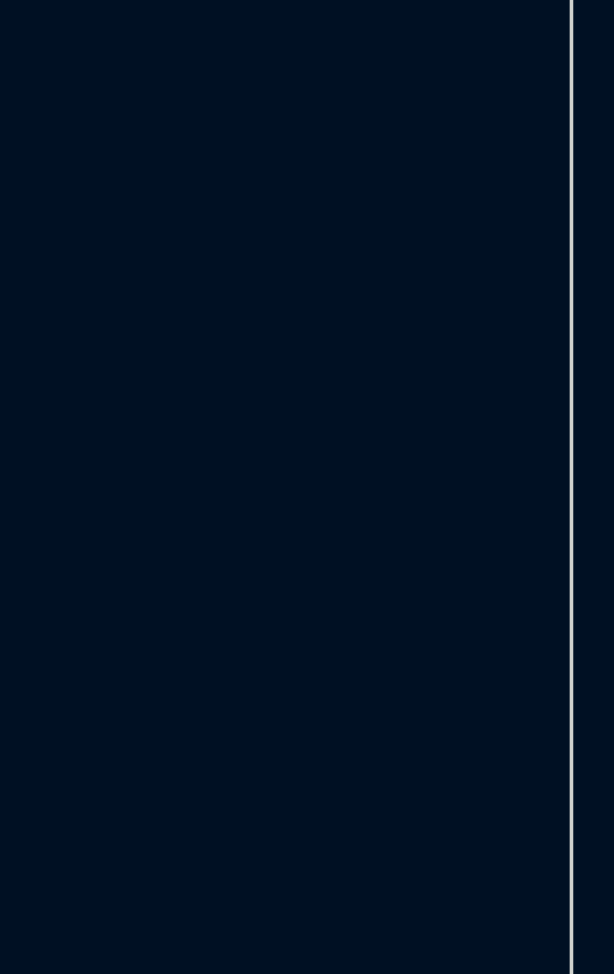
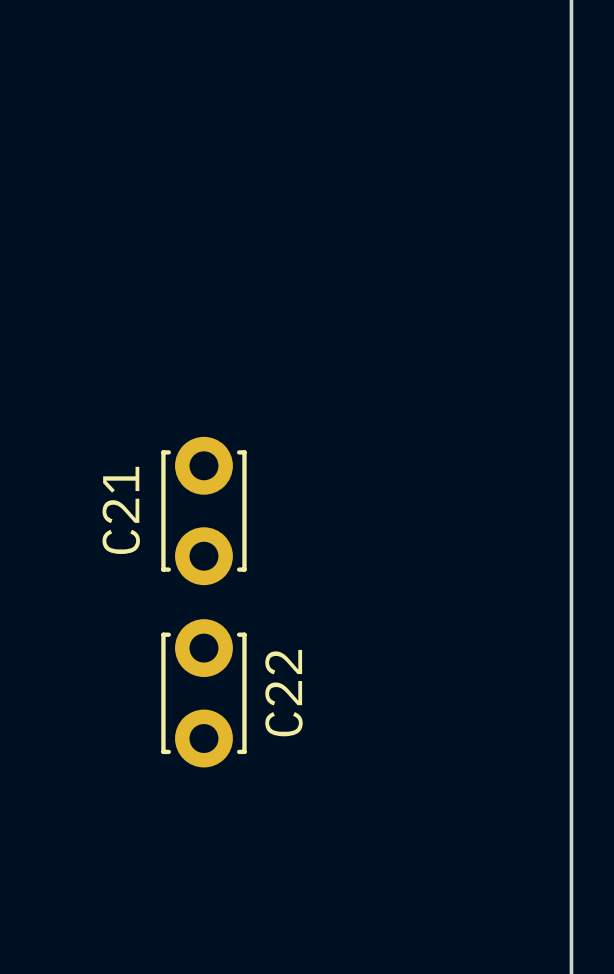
C21: none -> (203, 511)
C22: none -> (203, 693)

